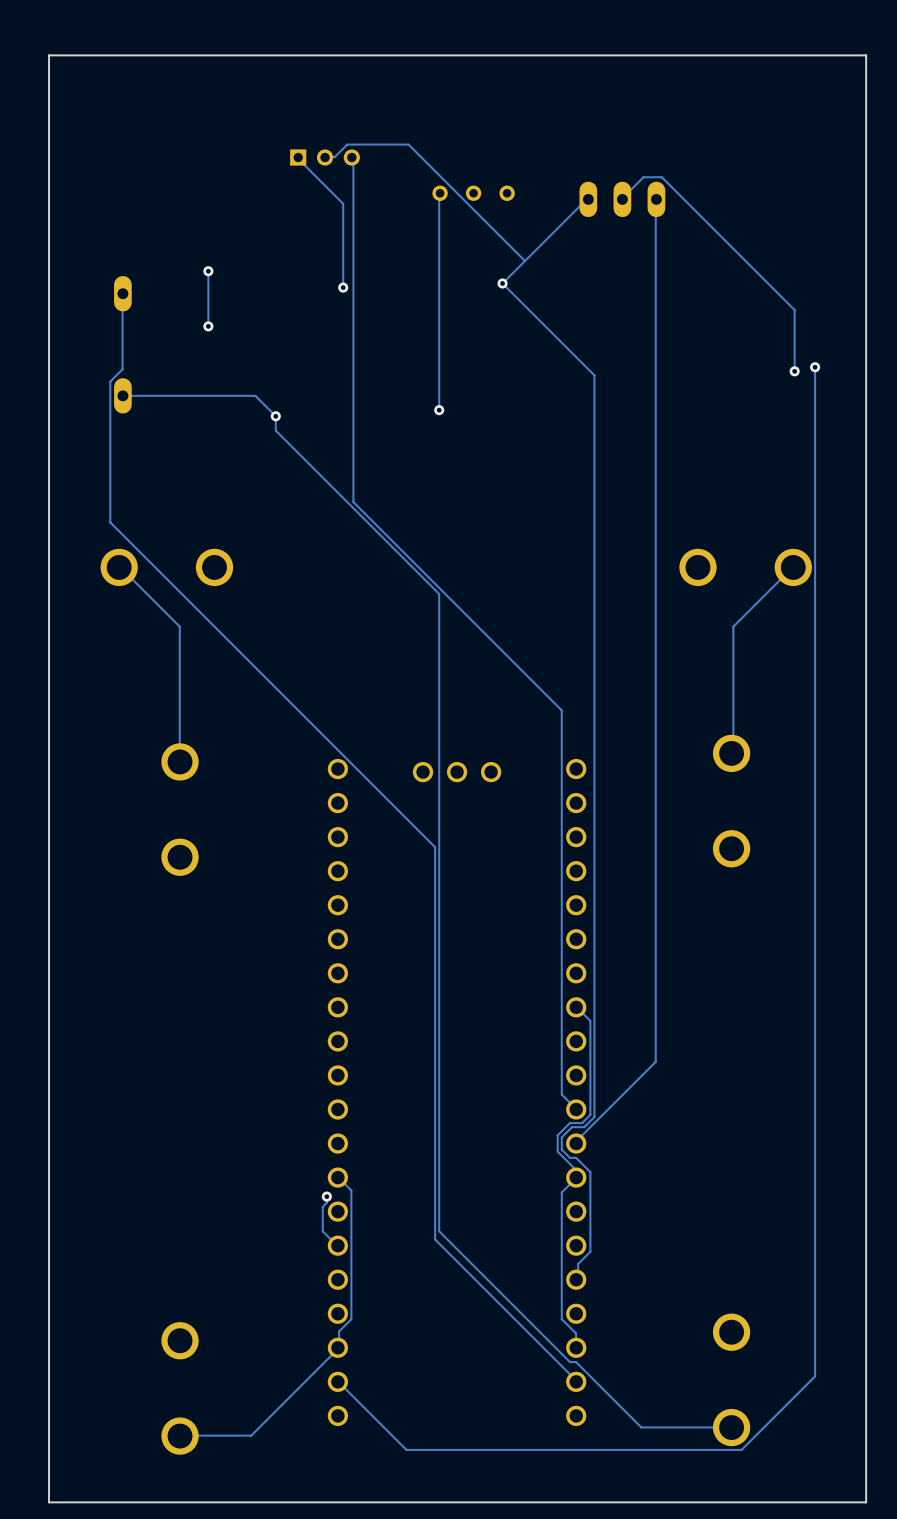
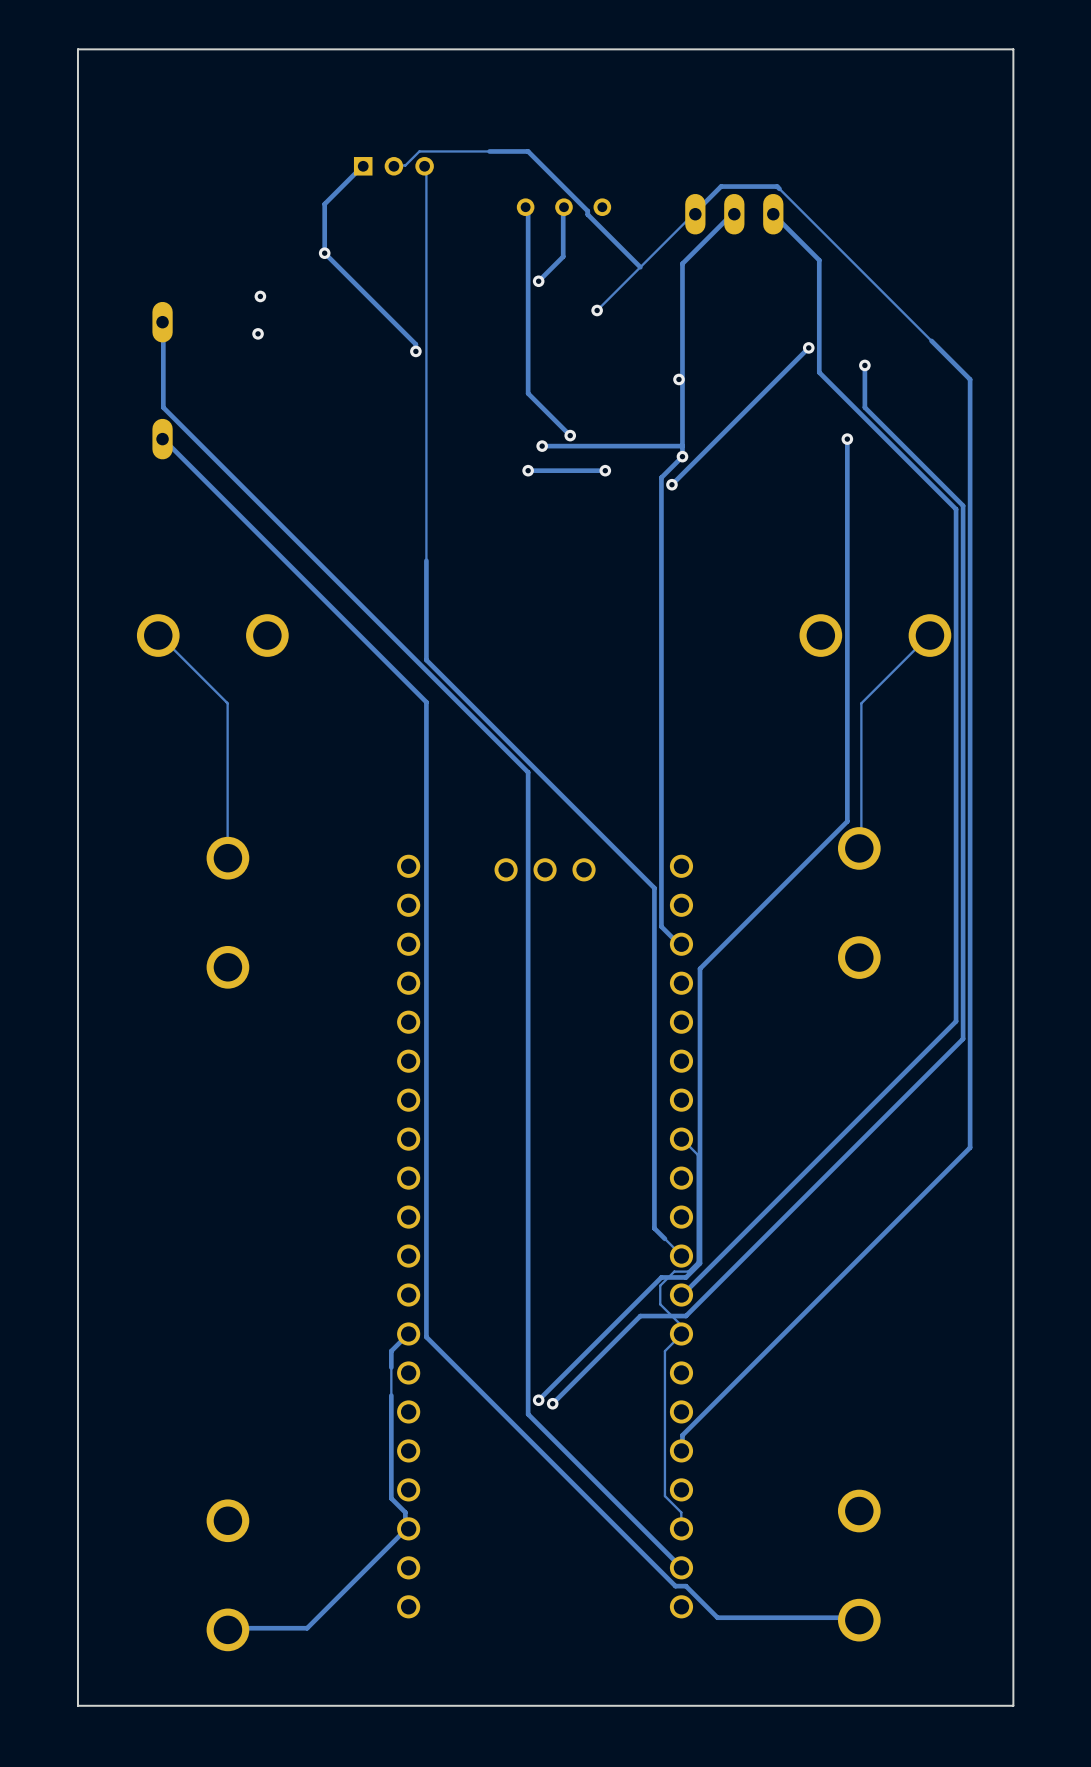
track: (408, 144) (525, 261) -> (489, 151) (528, 151) (640, 267)
track: (298, 157) (343, 203) (343, 287) -> (363, 166) (324, 204) (324, 253) (415, 344) (415, 351)
track: (661, 177) (643, 177) (622, 199) -> (779, 188) (777, 186) (721, 186) (693, 214)
track: (440, 193) (439, 410) -> (525, 207) (528, 207) (528, 393) (570, 435)
track: none -> (563, 207) (563, 256) (538, 281)
track: none -> (734, 214) (731, 214) (682, 263) (682, 456) (661, 477) (661, 926) (678, 944) (681, 944)
track: (656, 199) (655, 1061) (578, 1139) (578, 1143) (576, 1143) -> (773, 214) (819, 260) (819, 372) (956, 509) (956, 1021) (681, 1295)
via: none -> (324, 253)
via: none -> (538, 281)
track: (208, 271) (208, 326) -> none
track: (503, 282) (594, 375) (594, 1116) (584, 1127) (571, 1127) (561, 1137) (561, 1149) (569, 1157) (576, 1157) (590, 1172) (590, 1251) (578, 1264) (578, 1278) (576, 1279) -> (931, 340) (970, 379) (970, 1147) (682, 1435) (681, 1450)
via position: (343, 287) -> (415, 351)
track: (122, 293) (122, 369) (110, 381) (110, 522) (435, 847) (435, 1239) (576, 1381) -> (162, 322) (163, 407) (528, 772) (528, 1414) (681, 1567)
track: (794, 310) (794, 371) -> none
track: none -> (808, 347) (671, 484)
via: none -> (808, 347)
via position: (208, 326) -> (258, 333)
track: none -> (864, 365) (864, 407) (963, 505) (963, 1038) (685, 1316) (640, 1316) (552, 1403)
via: none -> (864, 365)
via: none -> (678, 379)
track: (815, 367) (815, 1376) (741, 1449) (406, 1449) (337, 1381) -> none
via: (815, 367) -> none
via: (794, 371) -> none
via: none -> (570, 435)
track: (123, 395) (255, 395) (275, 416) (275, 430) (439, 594) (439, 1231) (569, 1362) (576, 1362) (641, 1427) (731, 1427) -> (162, 439) (426, 702) (426, 1337) (675, 1586) (685, 1586) (717, 1617) (857, 1617) (859, 1620)
track: none -> (847, 439) (847, 821) (700, 968) (700, 1263) (685, 1277) (661, 1277) (538, 1400)
via: none -> (847, 439)
via: none -> (542, 446)
track: none -> (682, 446) (542, 446)
via: (439, 410) -> none
via: none -> (682, 456)
via: (275, 416) -> none
via: none -> (528, 470)
track: none -> (605, 470) (528, 470)
via: none -> (605, 470)
via: none -> (671, 484)
track: (353, 502) (561, 710) (561, 1094) -> (426, 560) (426, 660) (654, 888) (654, 1228) (664, 1238)
track: (337, 1177) (351, 1190) (351, 1319) (339, 1331) (339, 1347) (251, 1435) (180, 1436) -> (391, 1395) (391, 1498) (405, 1512) (405, 1526) (408, 1528) (307, 1628) (229, 1628) (227, 1629)
track: (326, 1196) (326, 1202) (322, 1206) -> (408, 1334) (391, 1351) (391, 1367)
via: (326, 1196) -> none
track: (322, 1231) (337, 1245) -> none
via: none -> (538, 1400)
via: none -> (552, 1403)

